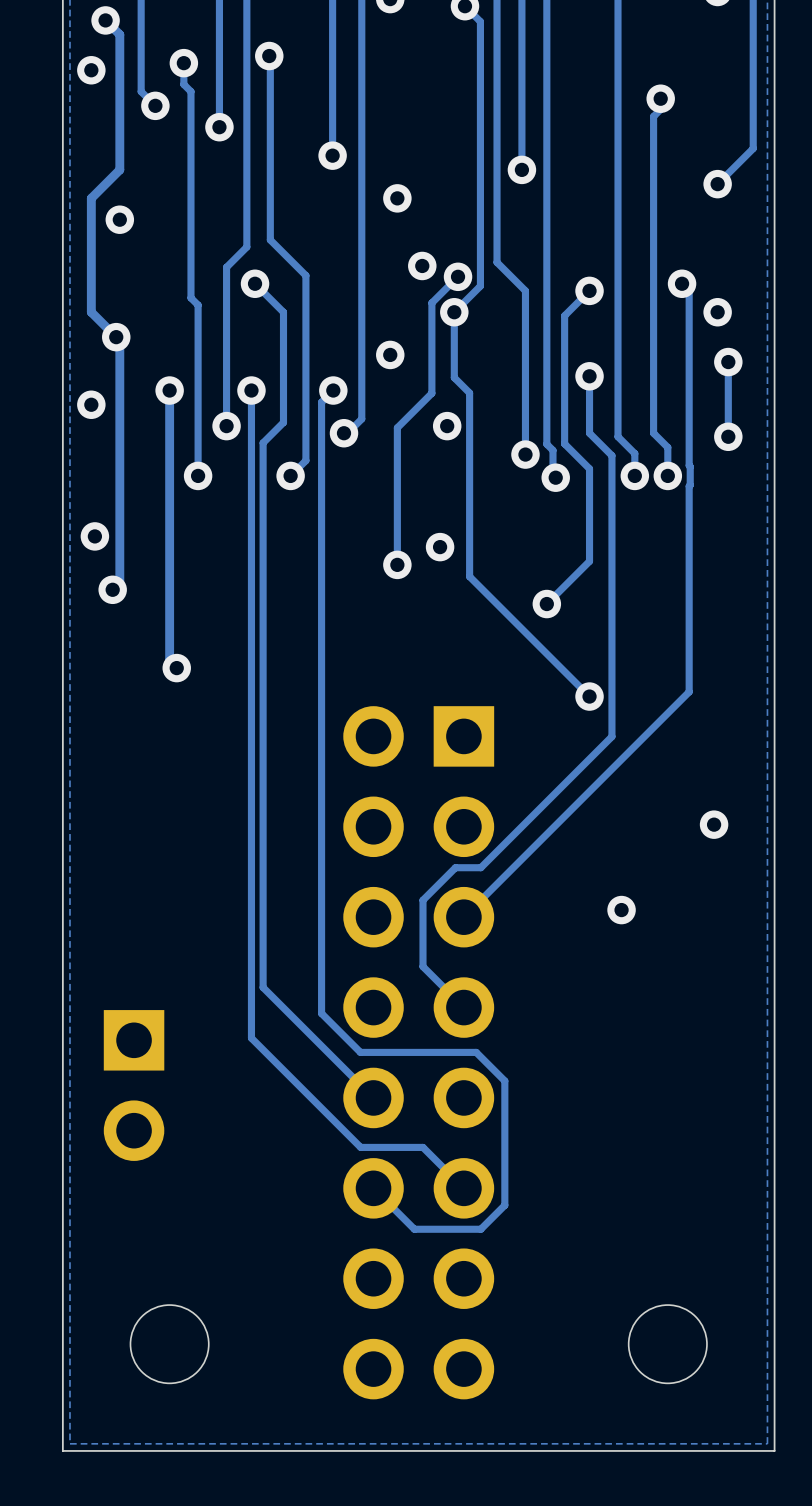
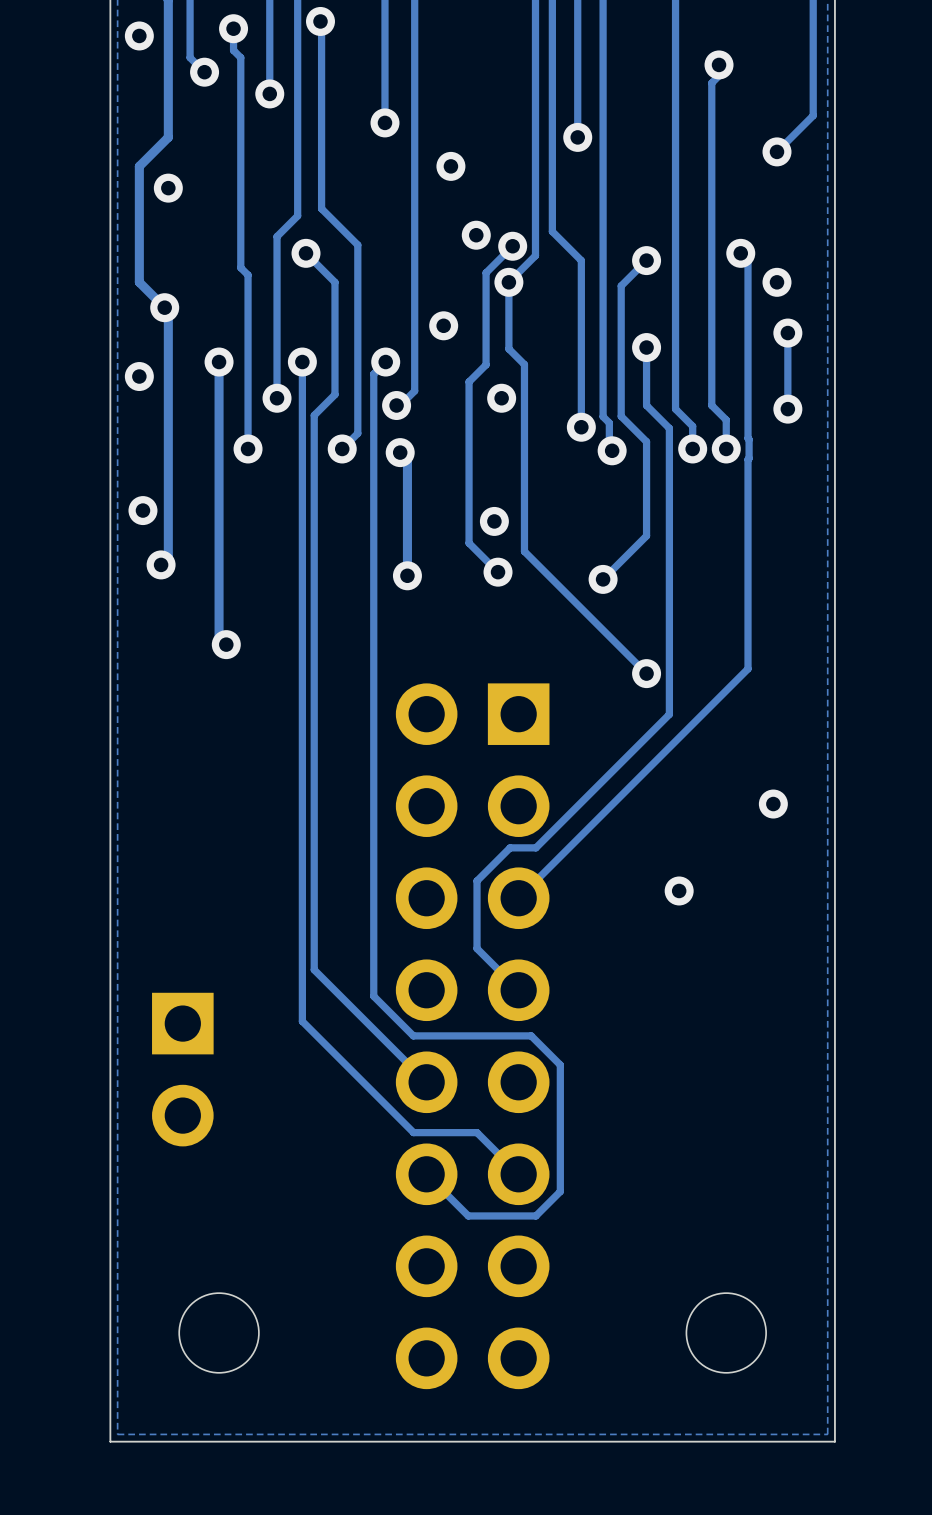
track: (415, 410) (397, 427) (397, 564) -> (469, 381) (469, 543) (498, 572)
track: none -> (400, 452) (407, 459) (407, 575)
via: none -> (400, 452)
via: (397, 564) -> none
via: none -> (498, 572)
via: none -> (407, 575)

